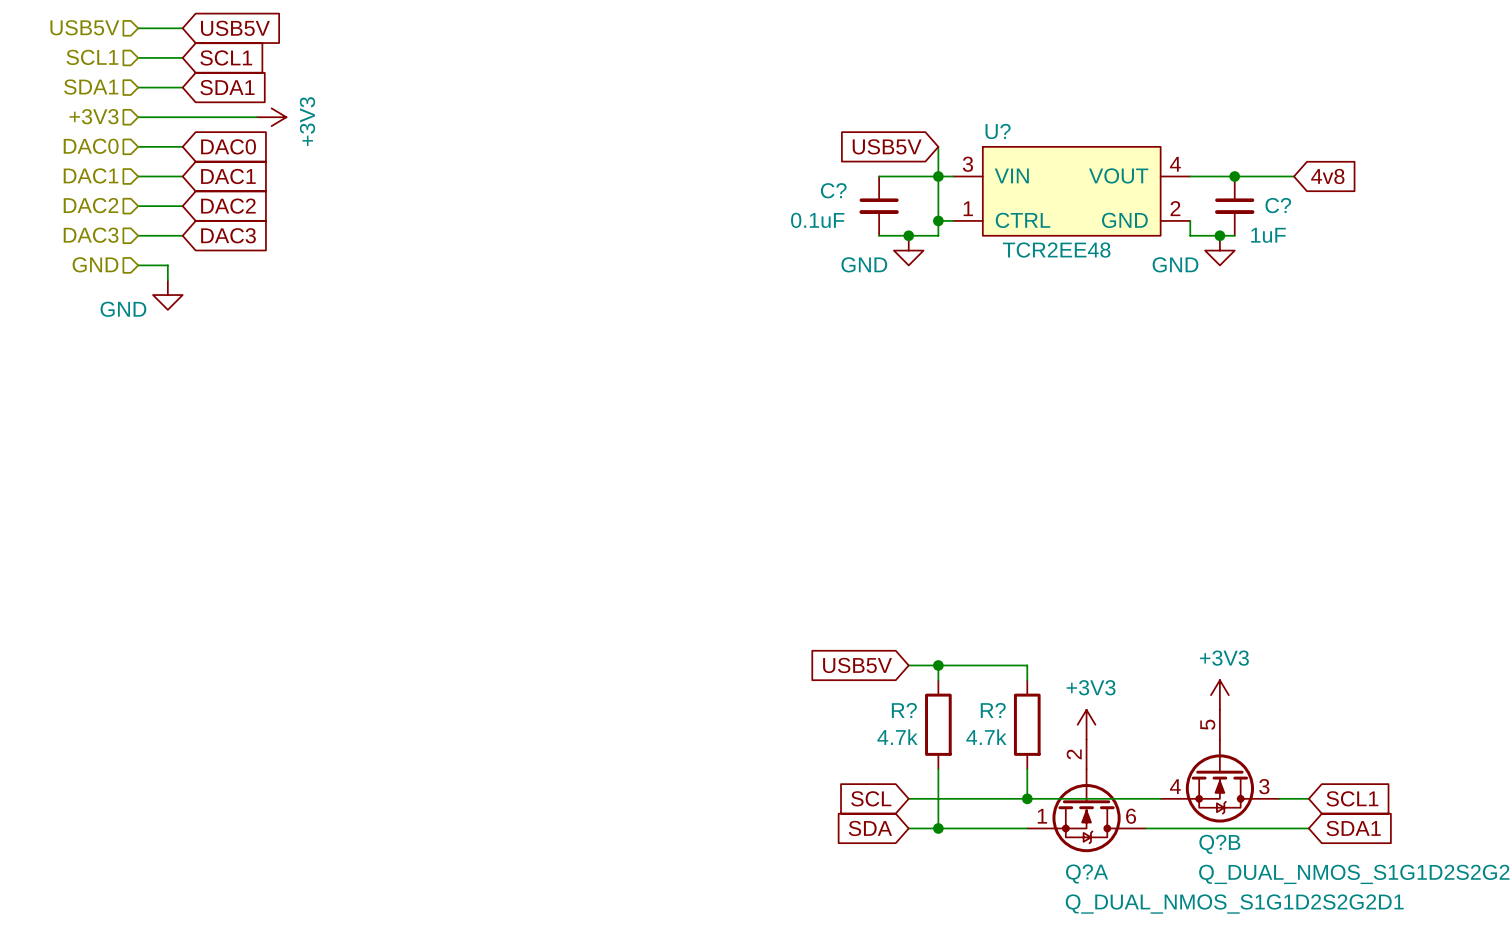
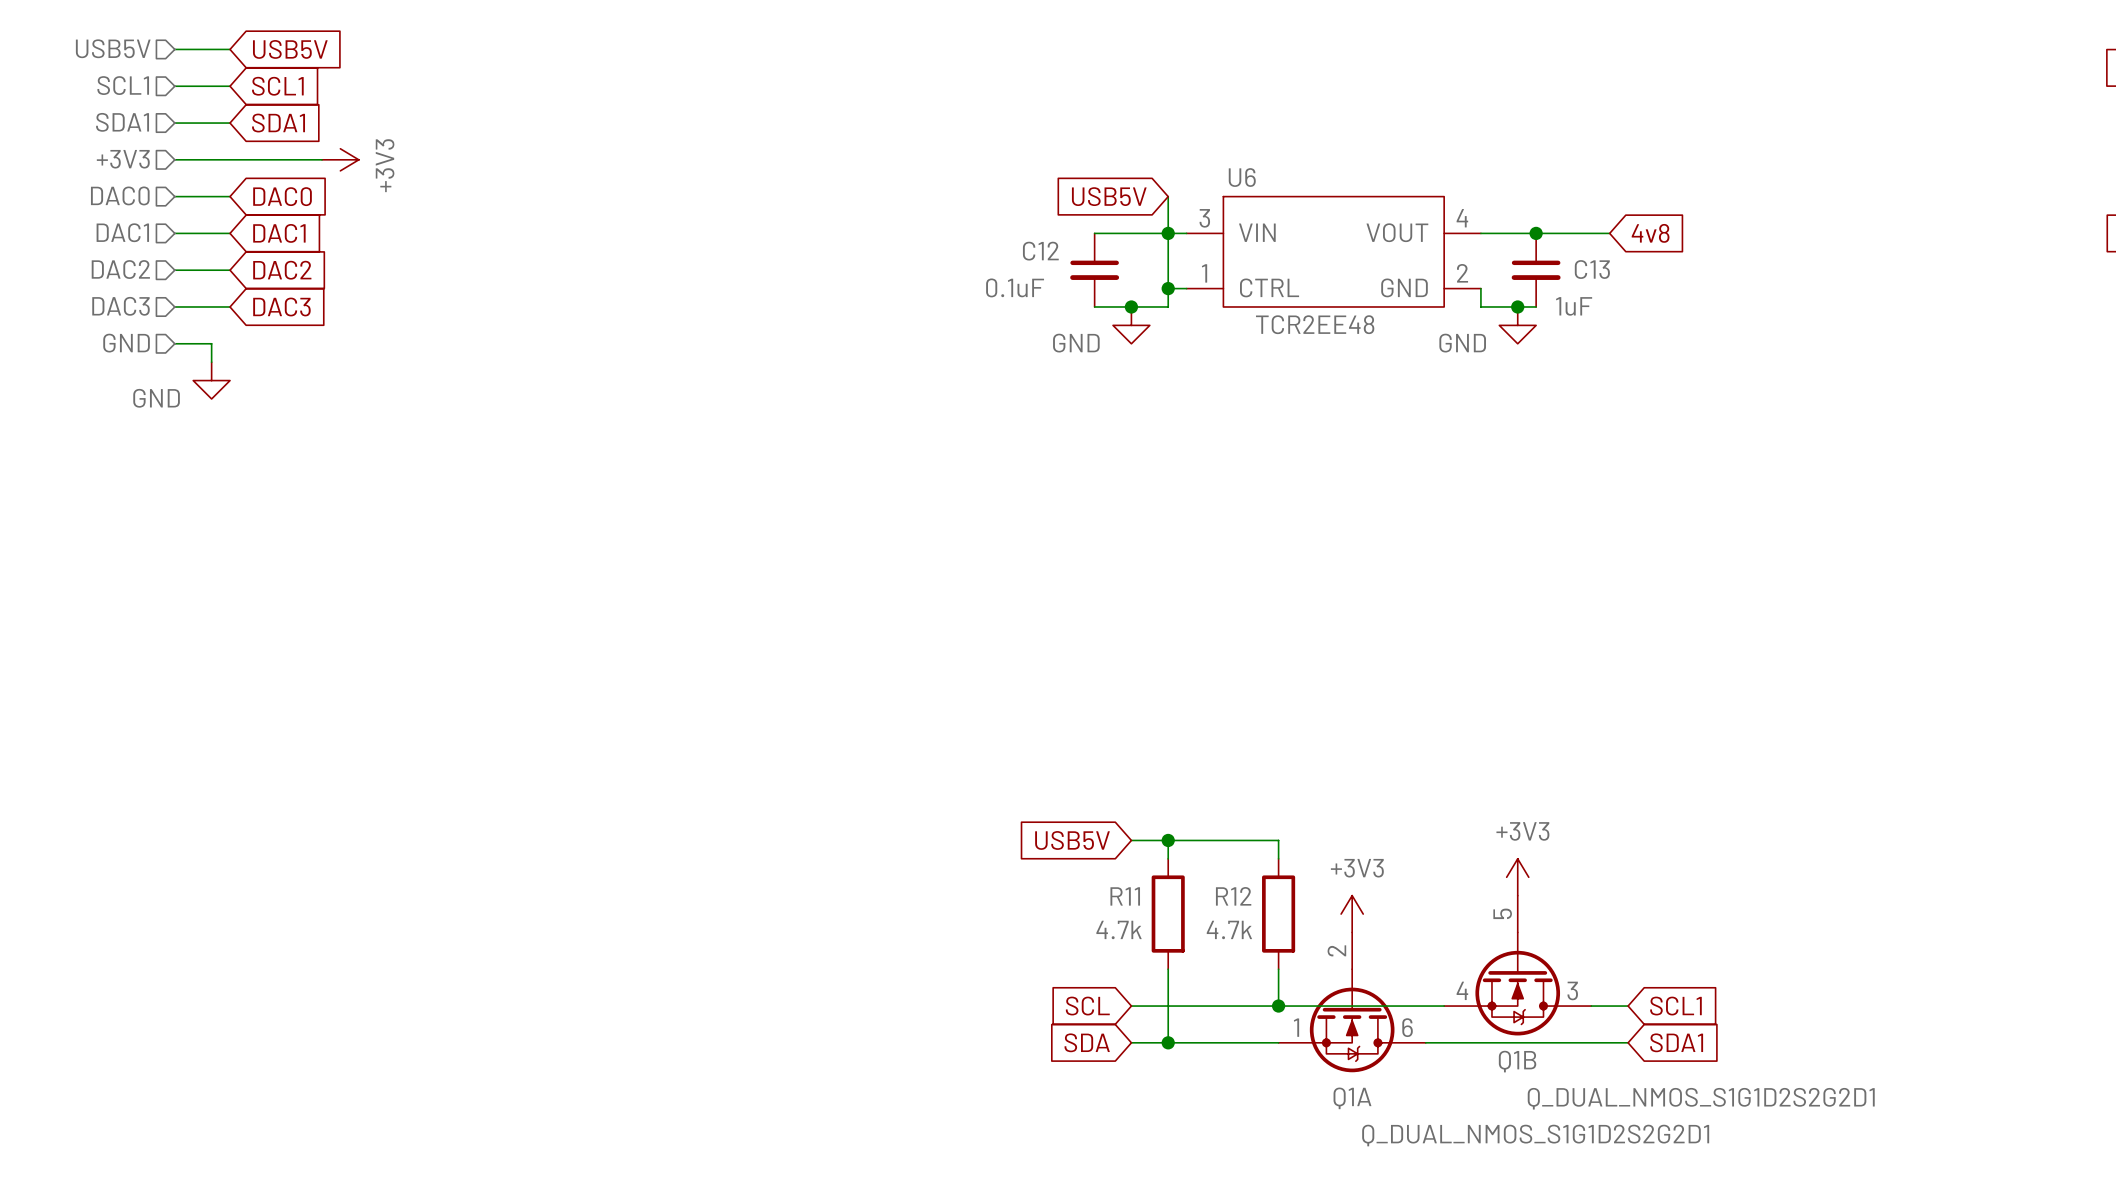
U? name: U? (998, 131) -> U6 (1242, 177)
C? name: C? (833, 190) -> C12 (1040, 251)
C? name: C? (1278, 205) -> C13 (1592, 269)
R? name: R? (904, 710) -> R11 (1125, 896)
R? name: R? (993, 710) -> R12 (1233, 896)
Q?B name: Q?B (1219, 844) -> Q1B (1517, 1061)
Q?A name: Q?A (1087, 873) -> Q1A (1352, 1098)

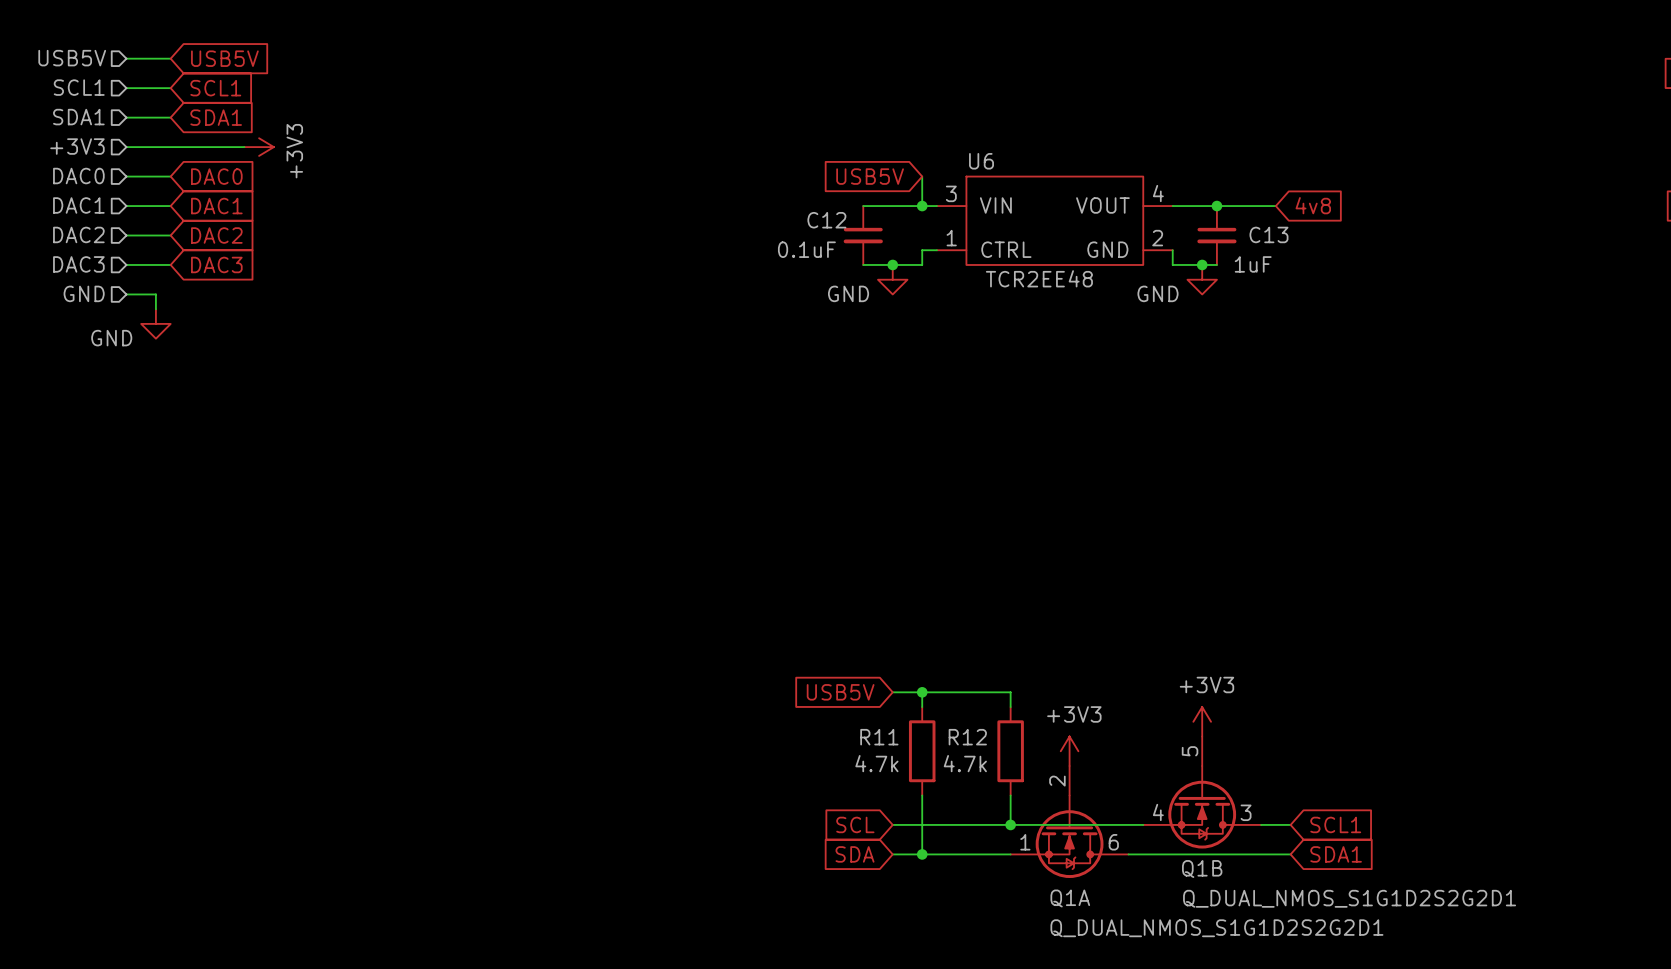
wire: (1168, 233) (1168, 288) -> none
junction: (1168, 288) -> none

